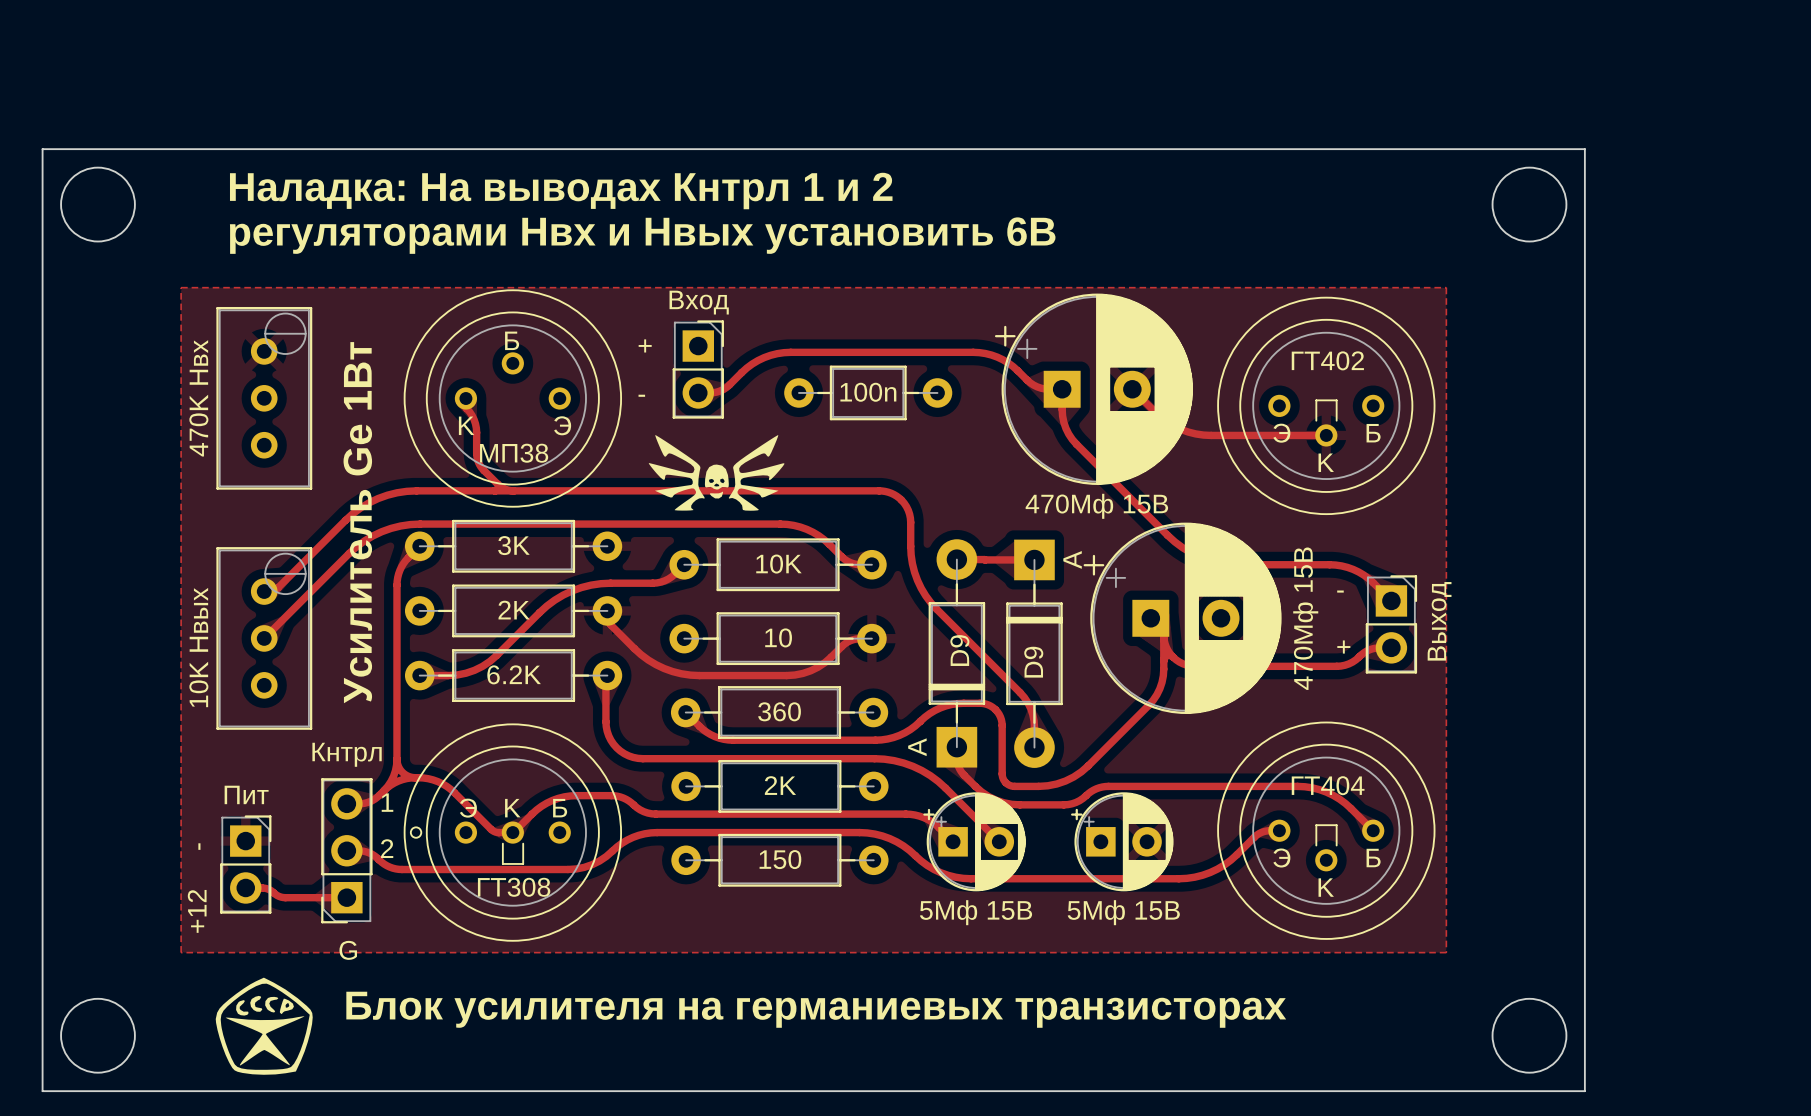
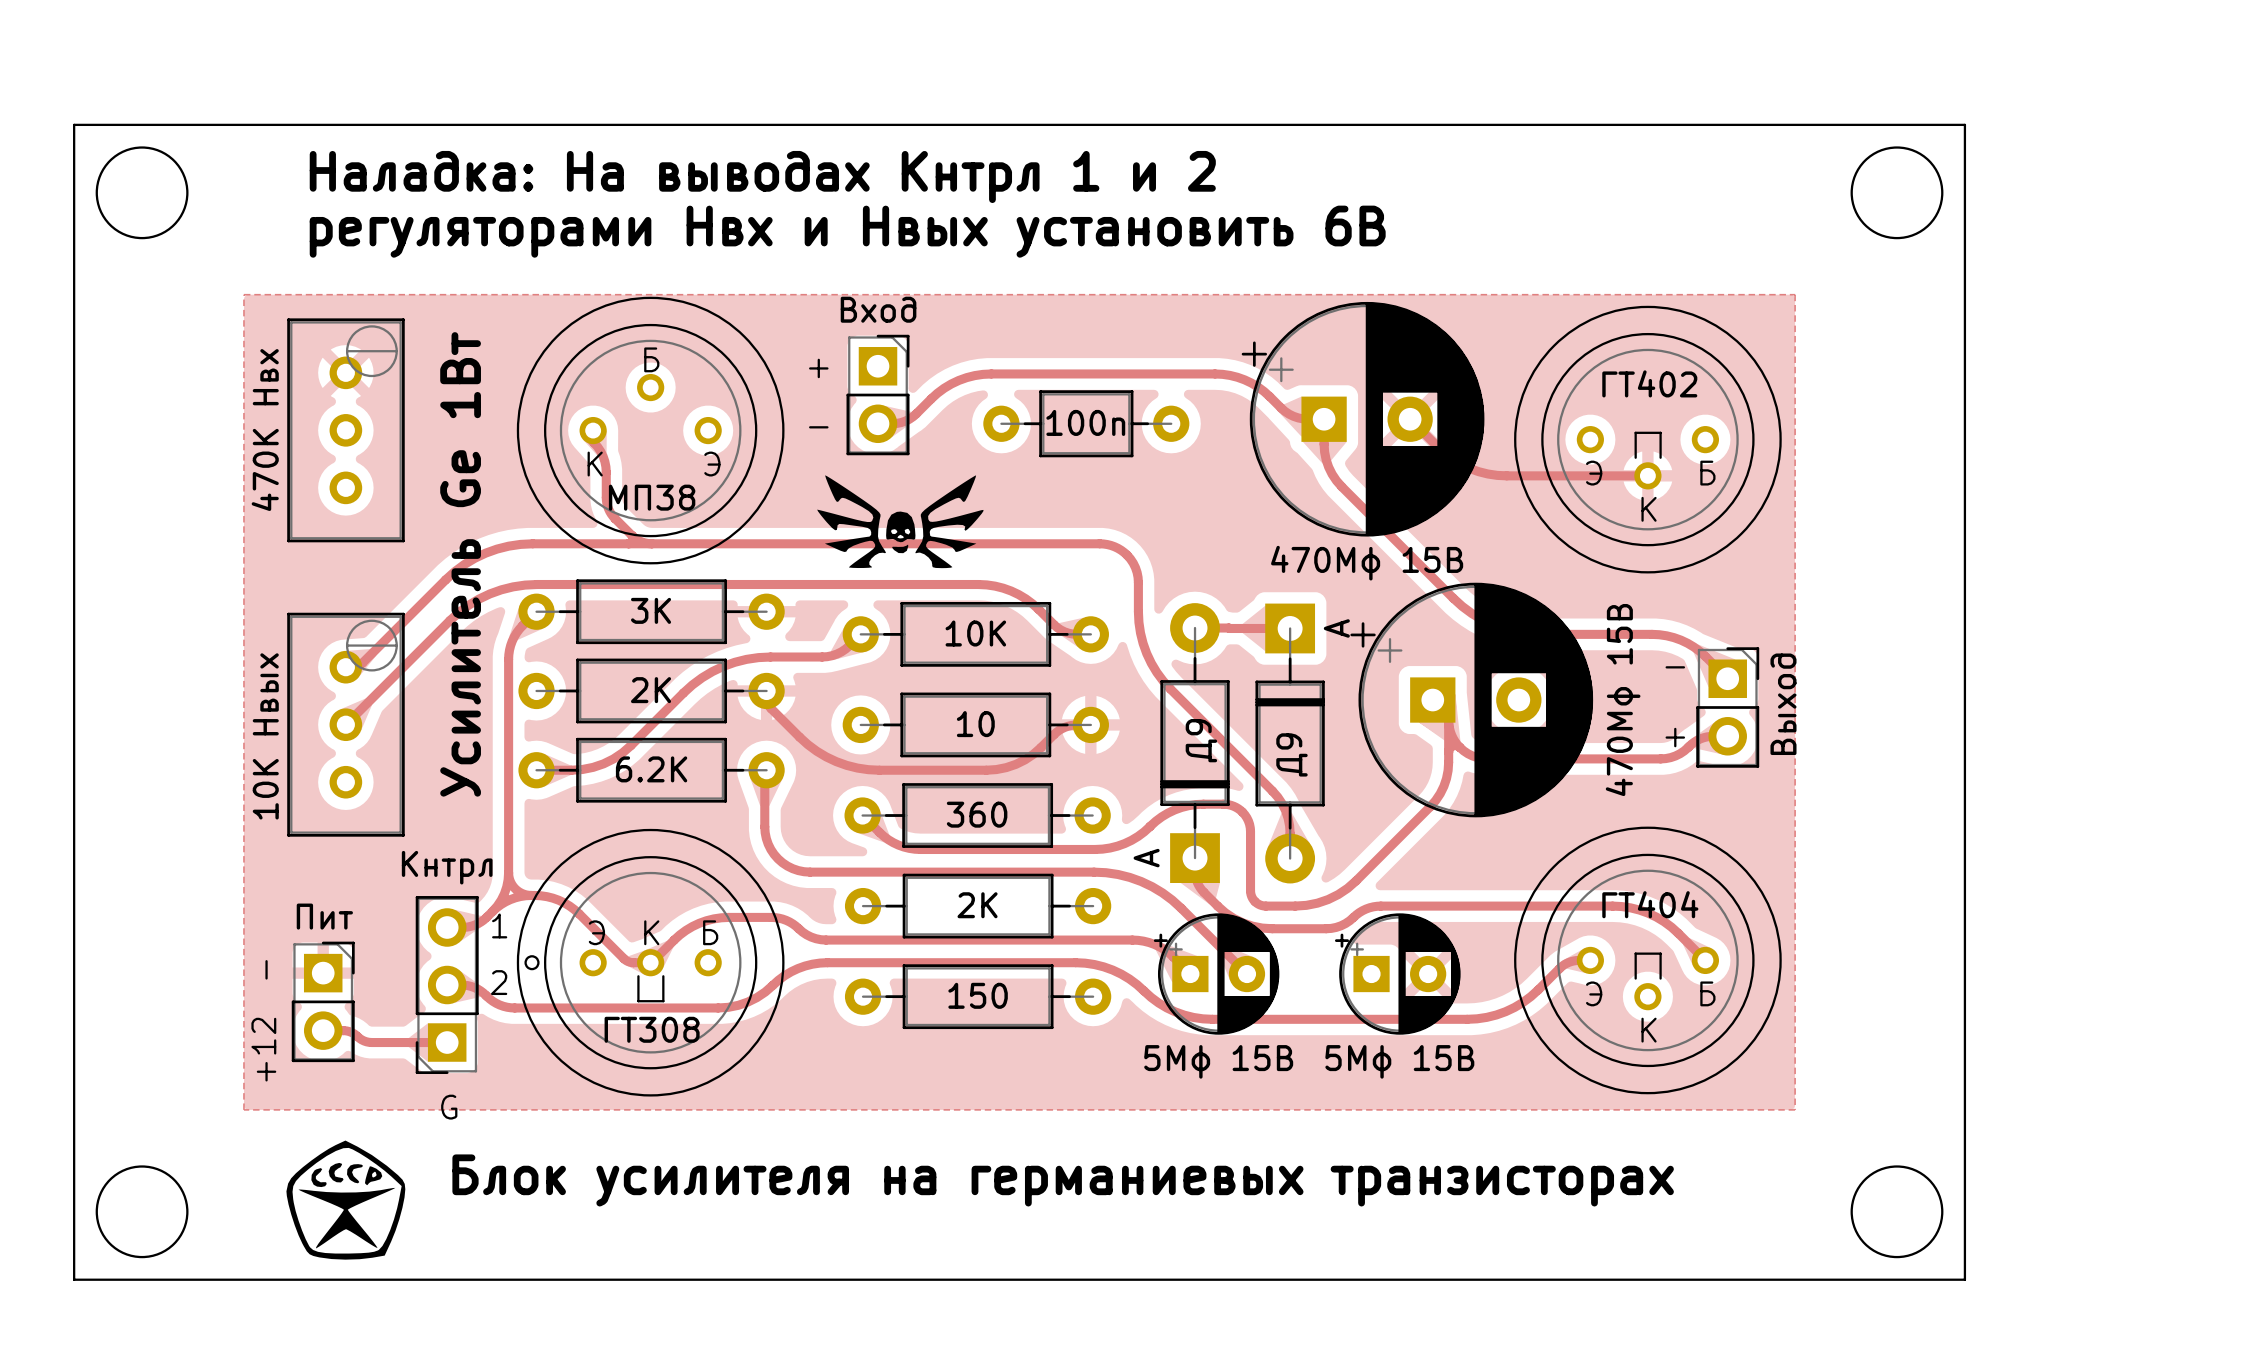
part value: D9 (959, 650) -> Д9 (1201, 740)
part value: D9 (1033, 662) -> Д9 (1291, 754)

